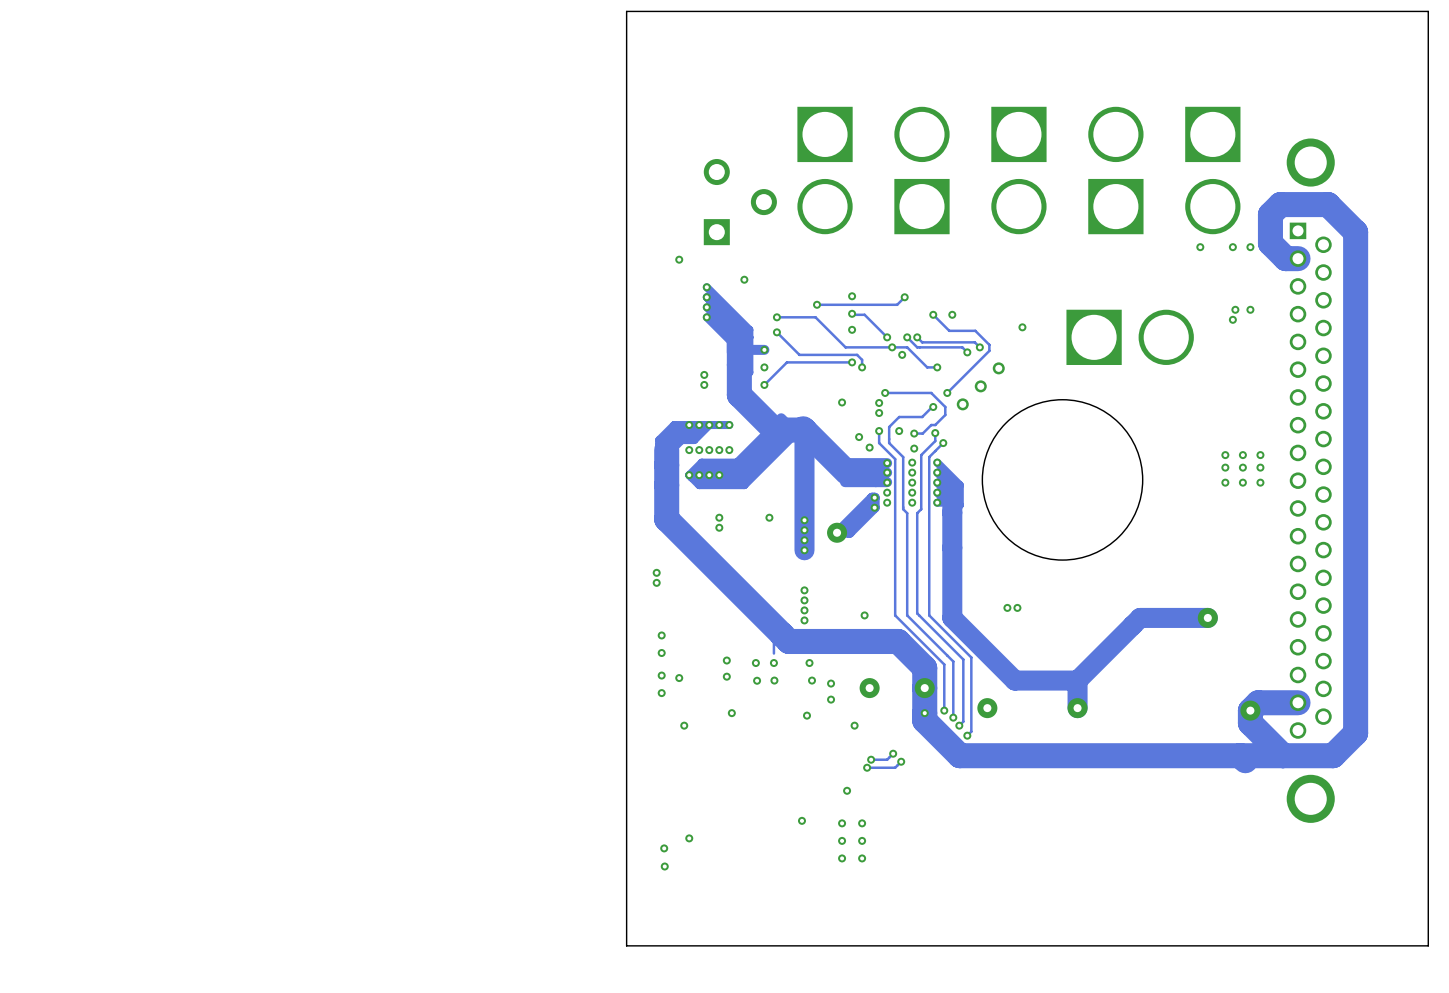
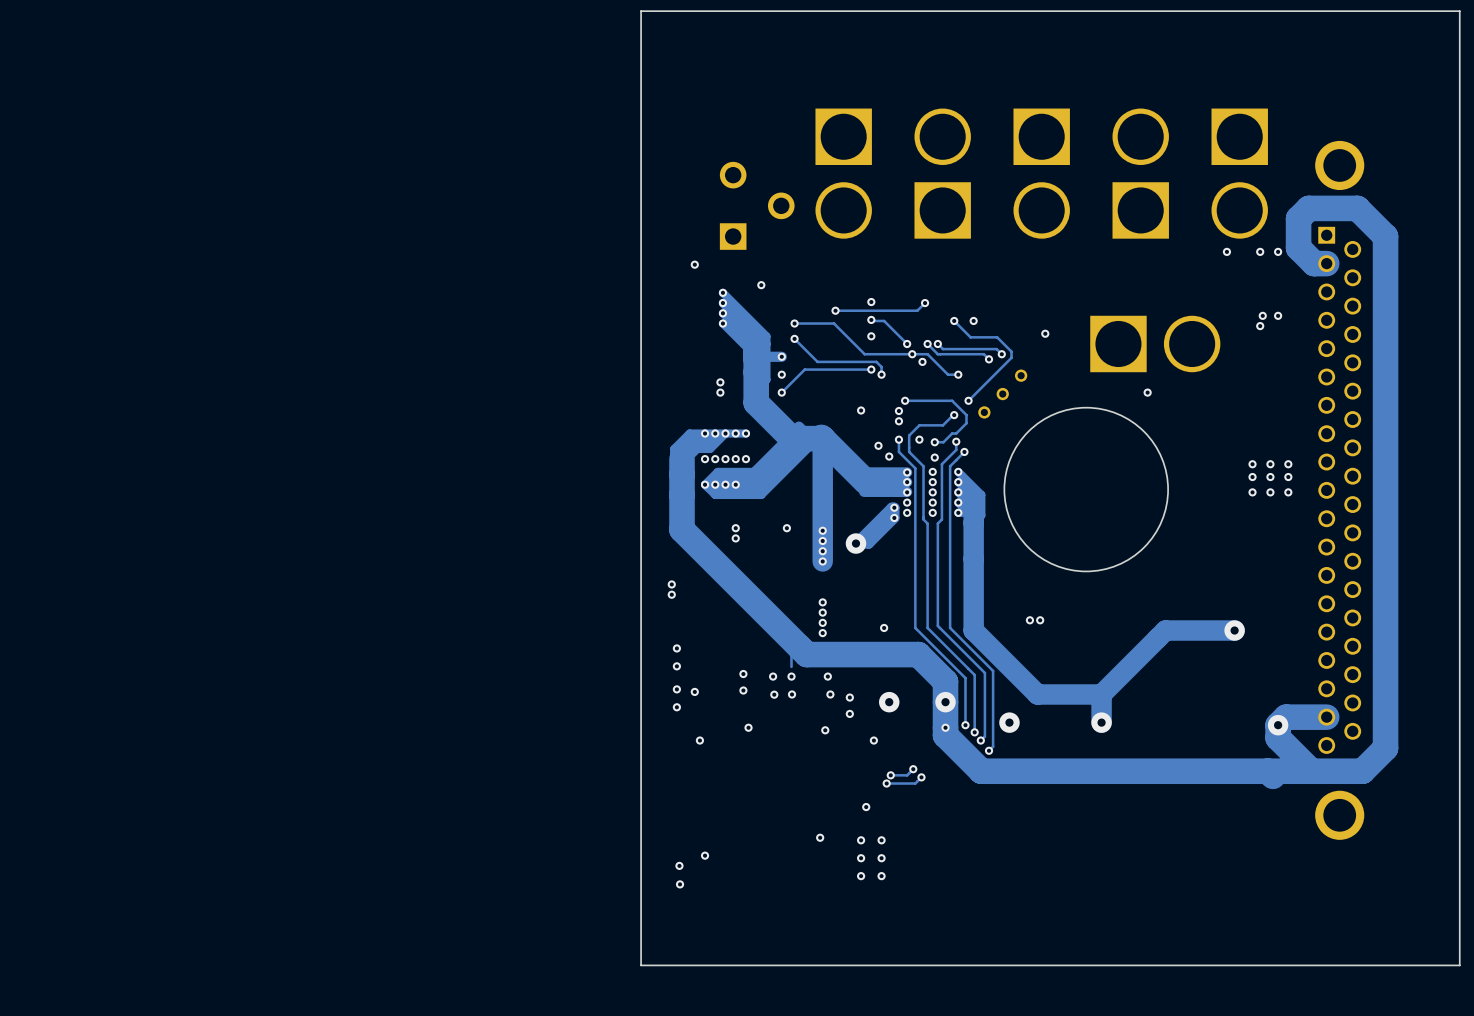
via: none -> (1147, 392)

